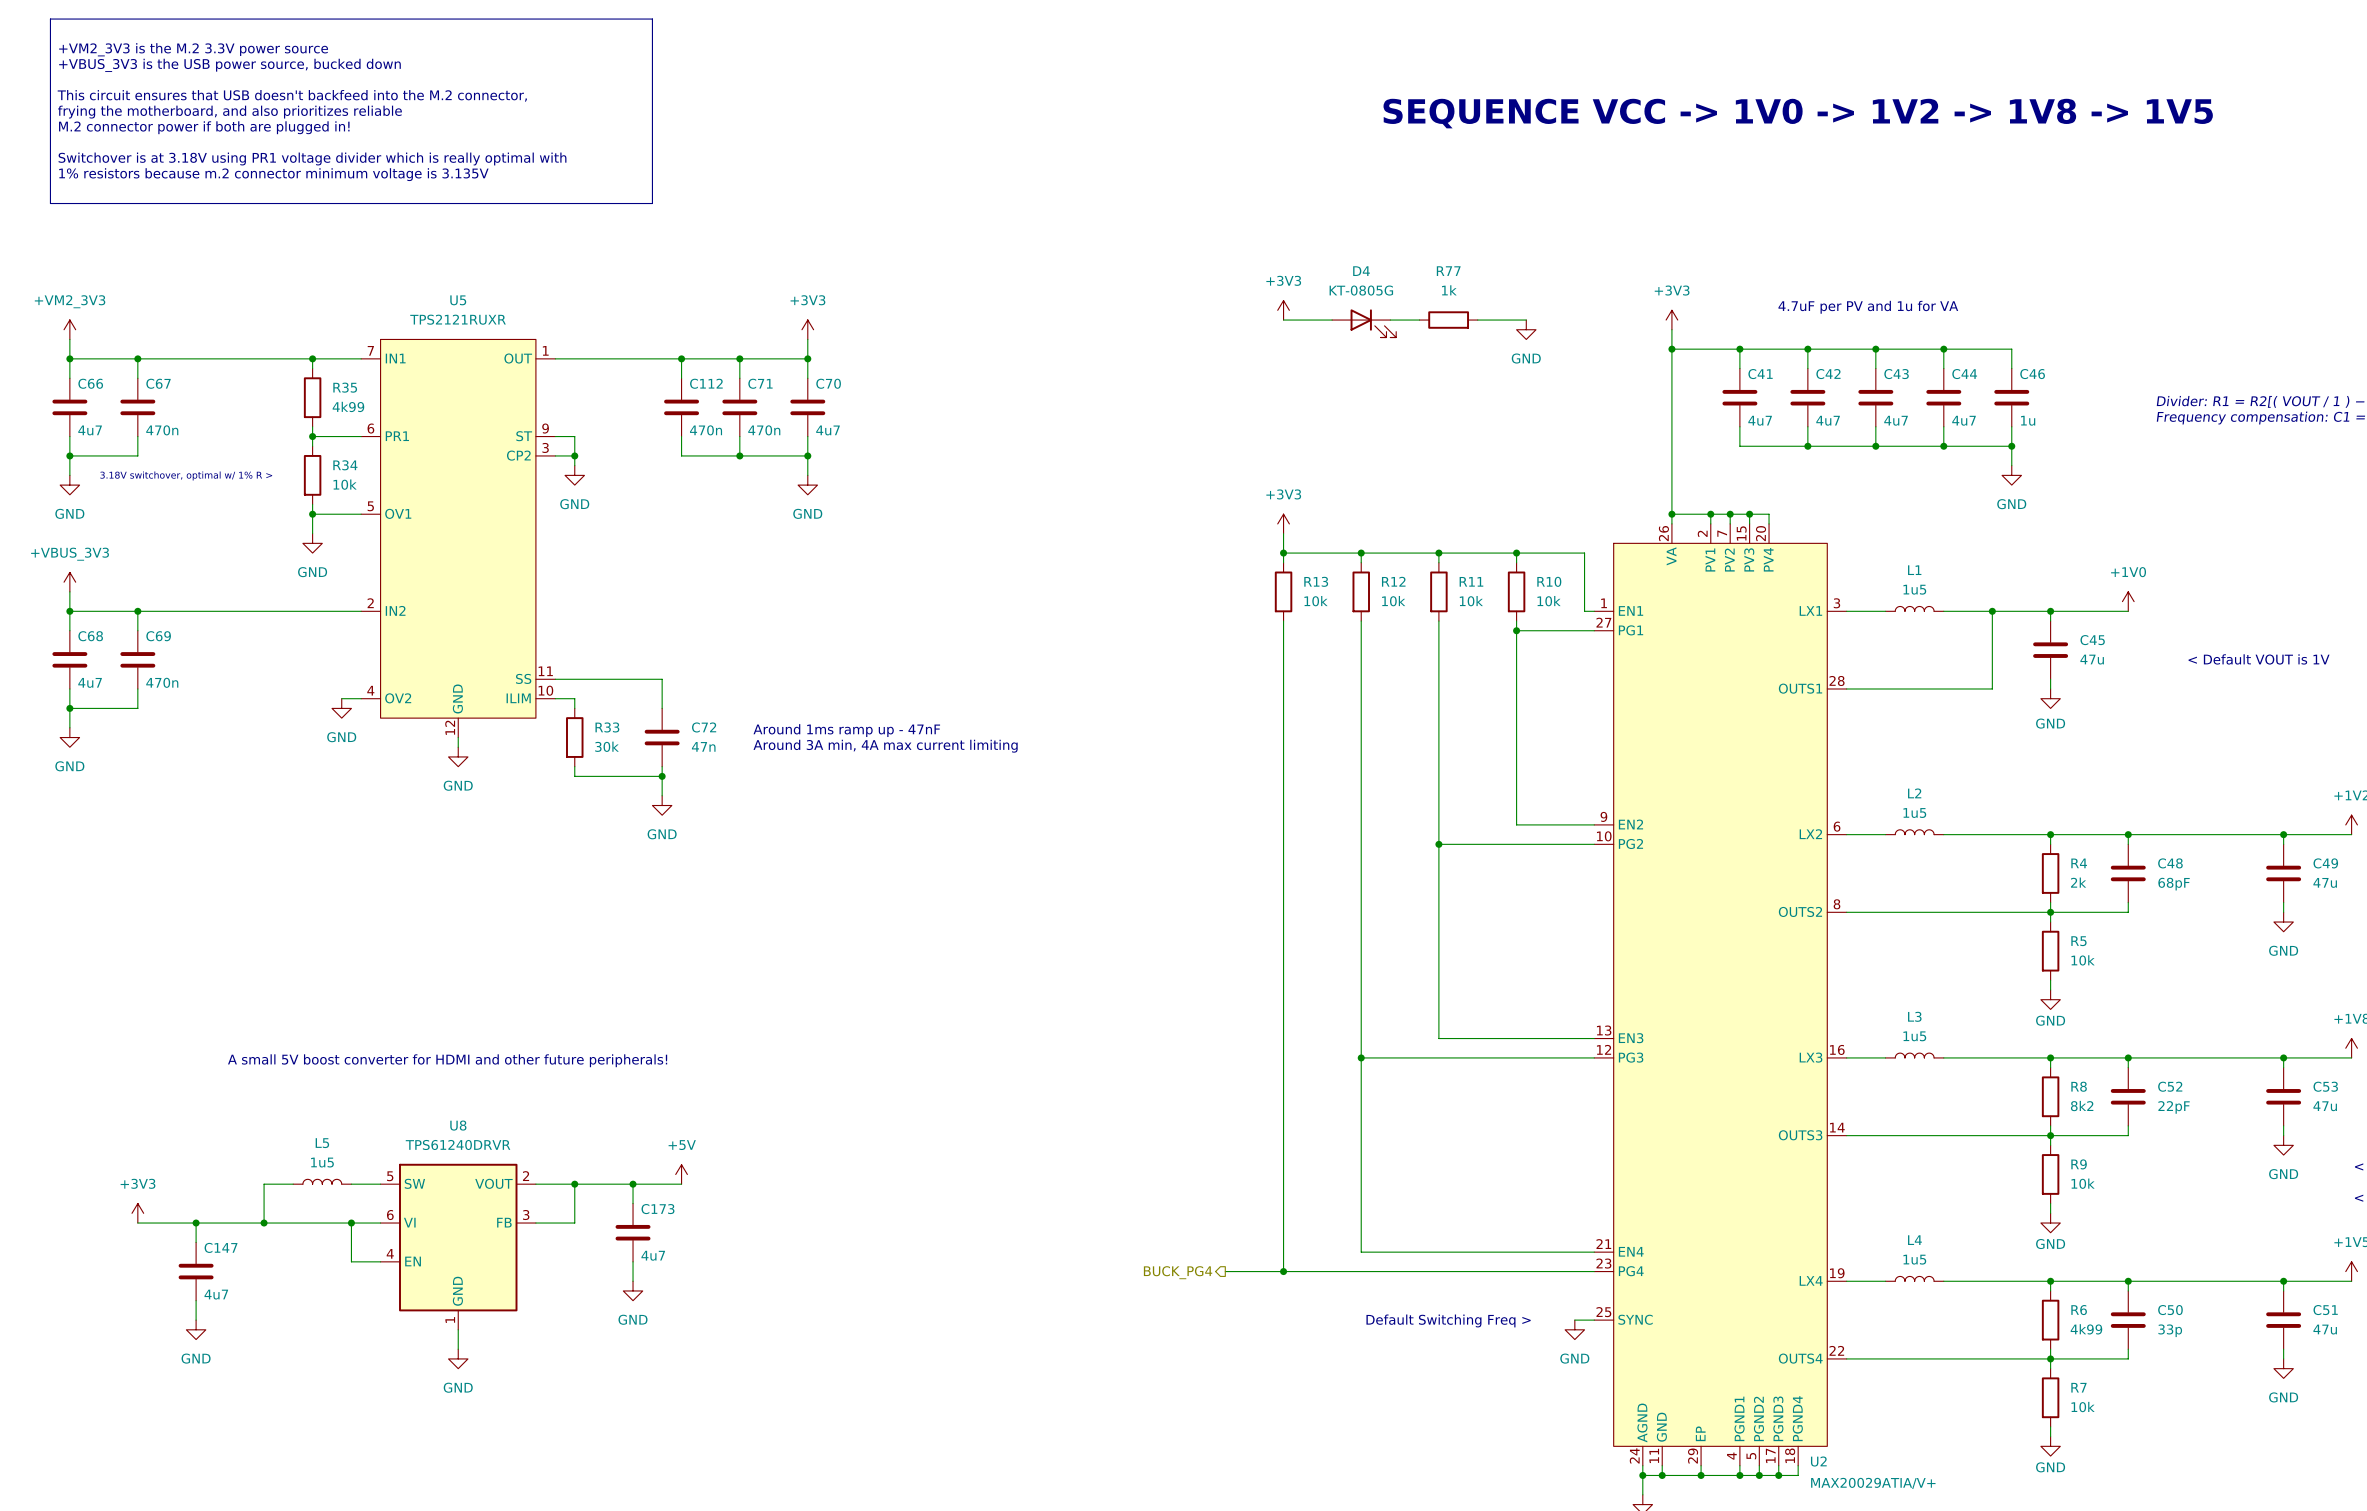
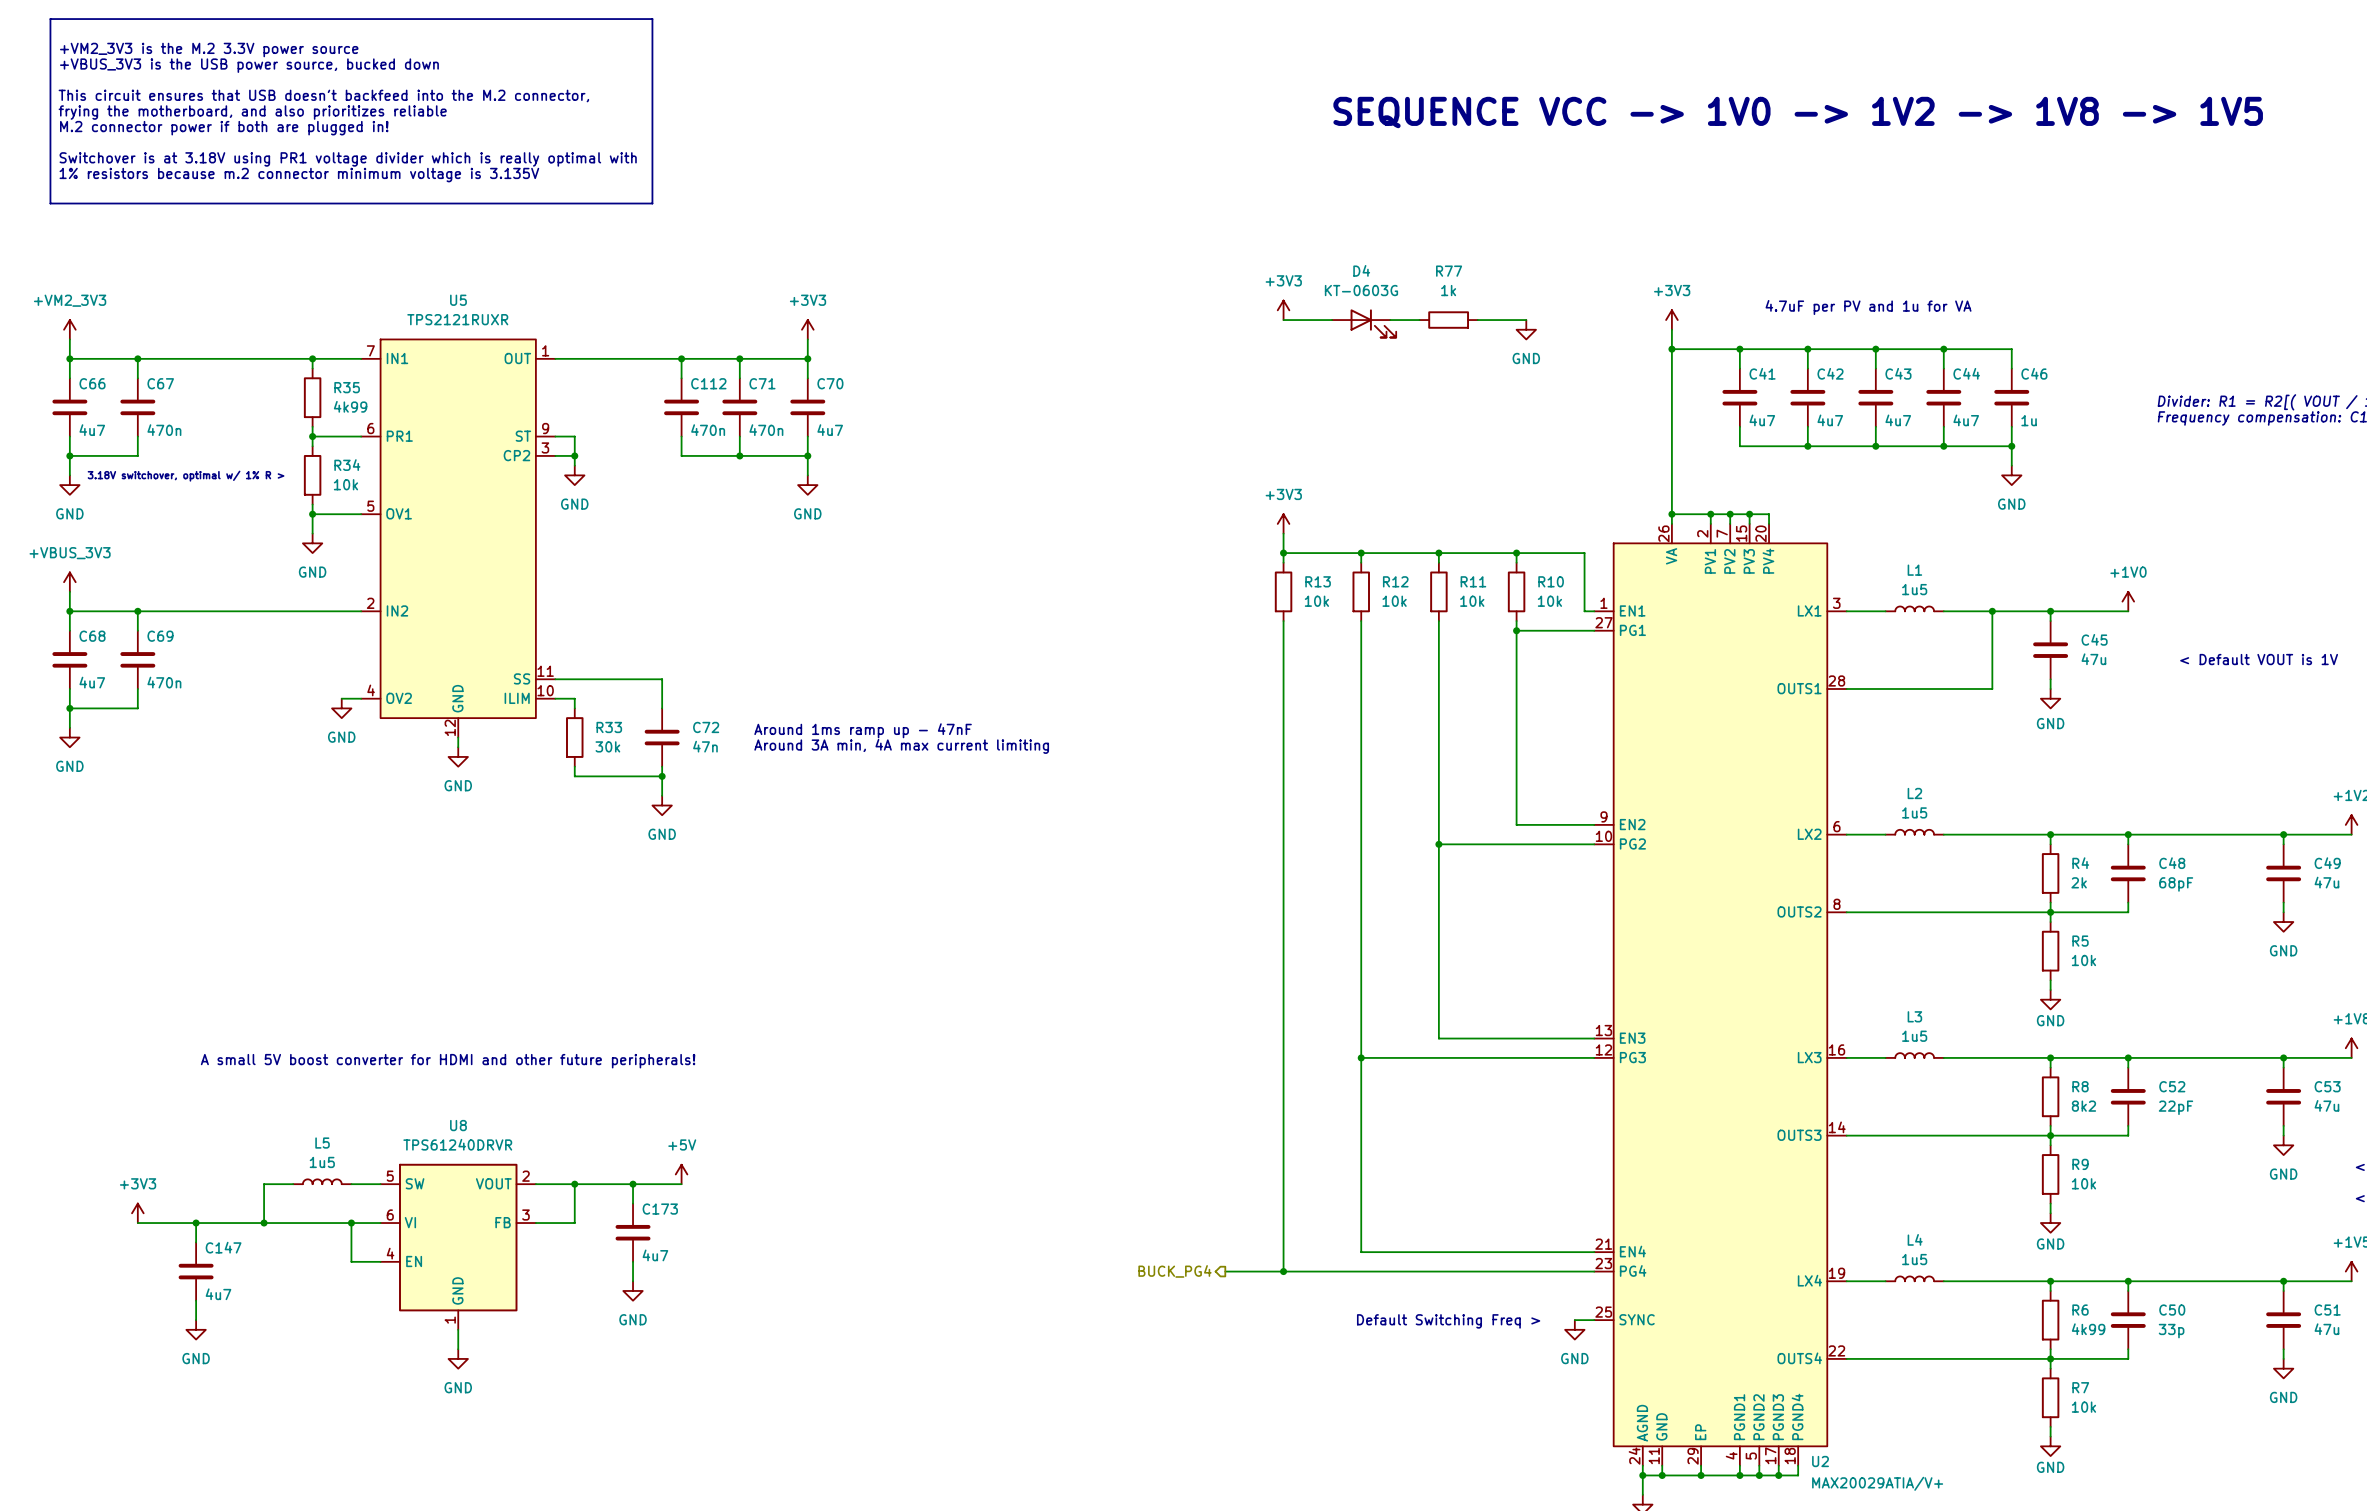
D4 value: KT-0805G (1361, 290) -> KT-0603G (1361, 290)

